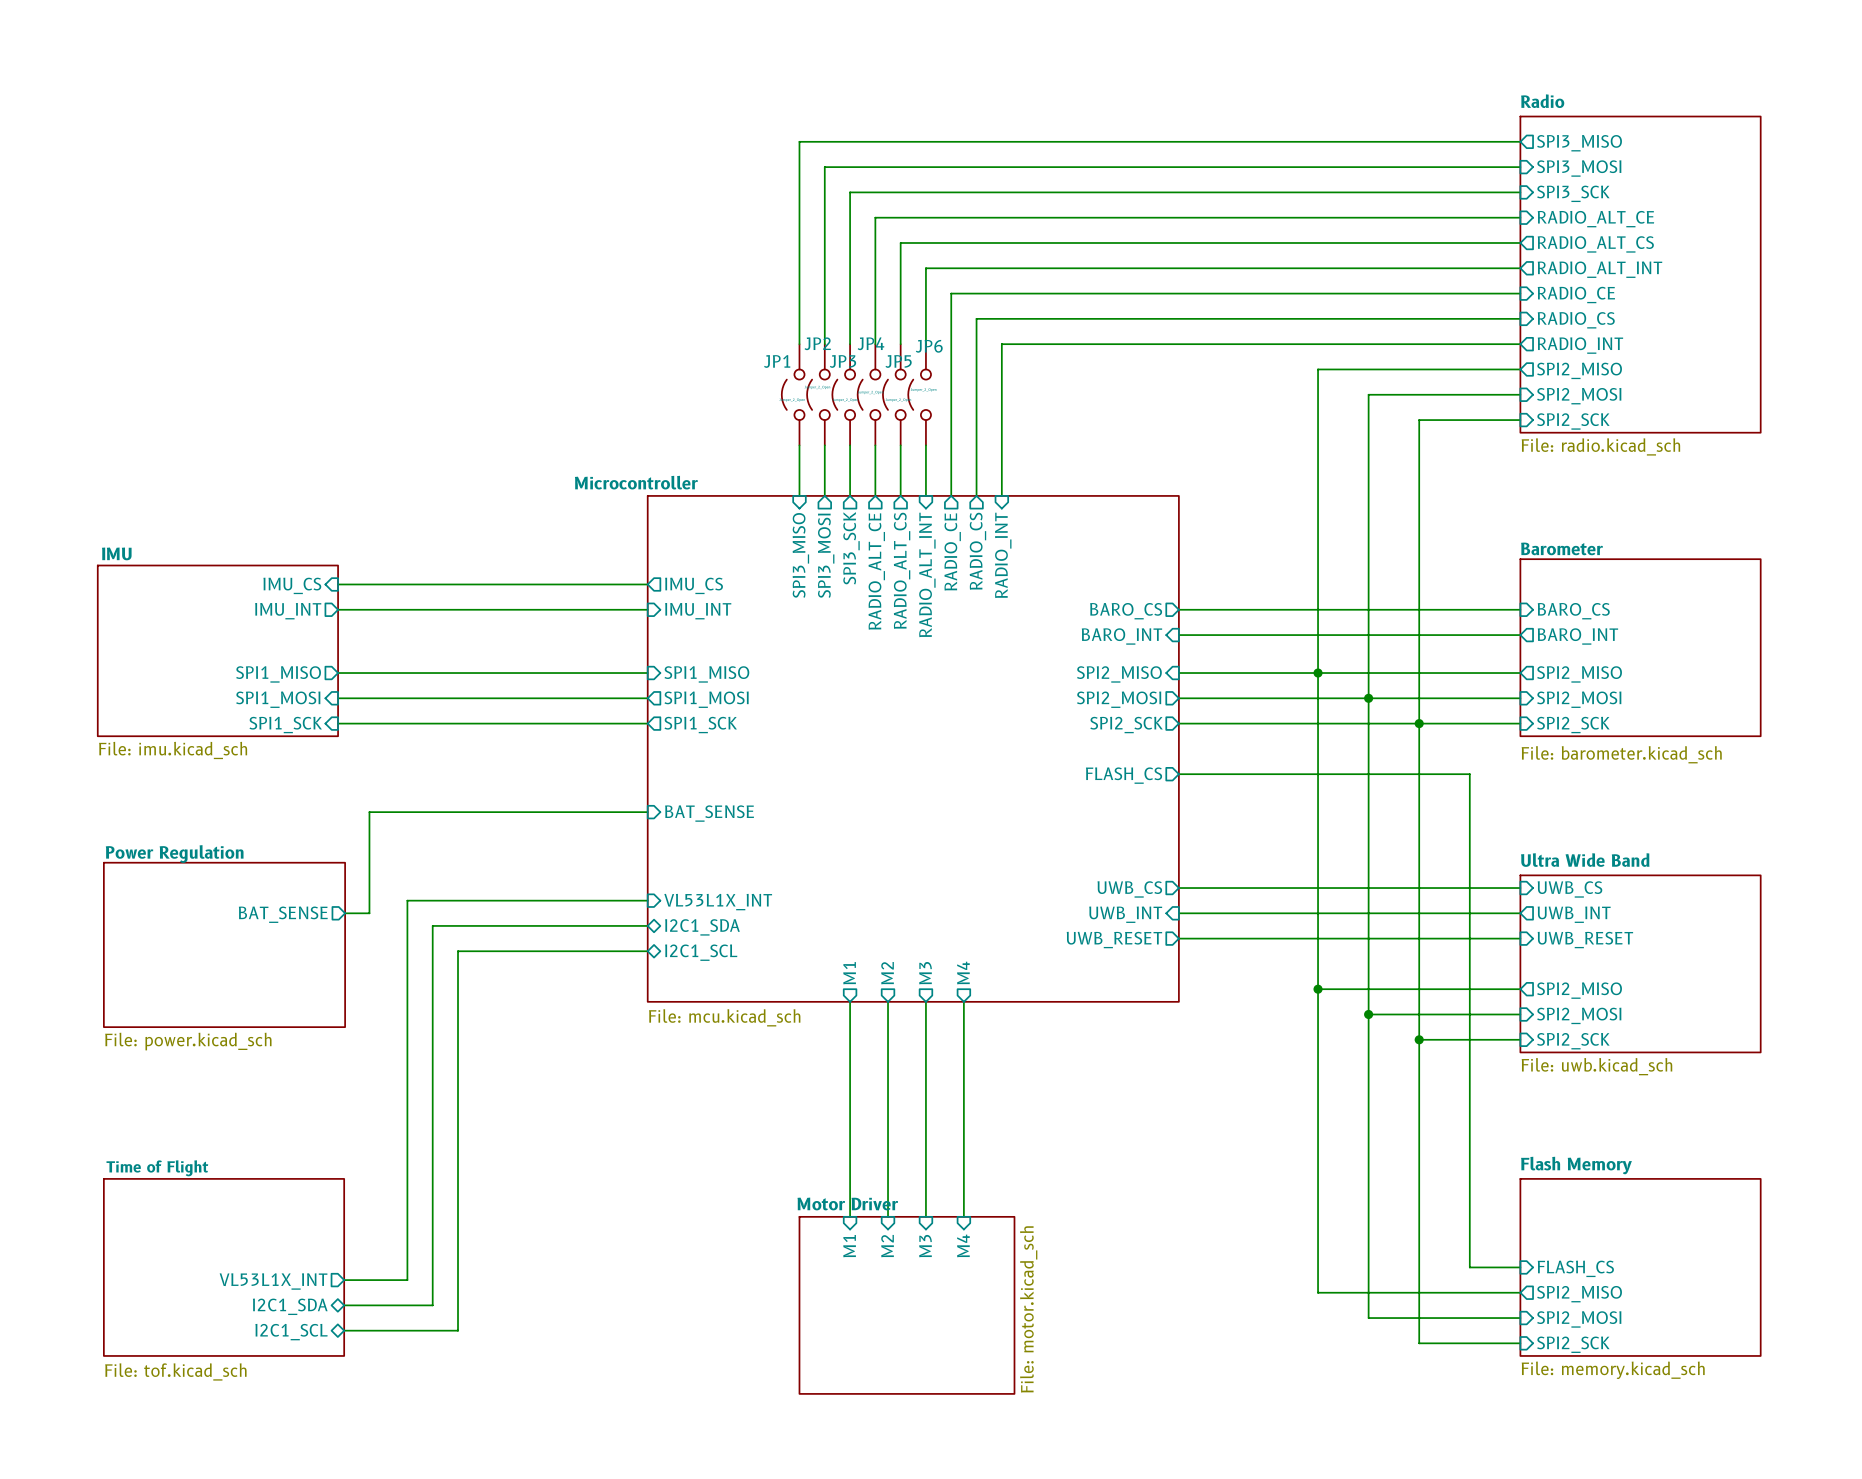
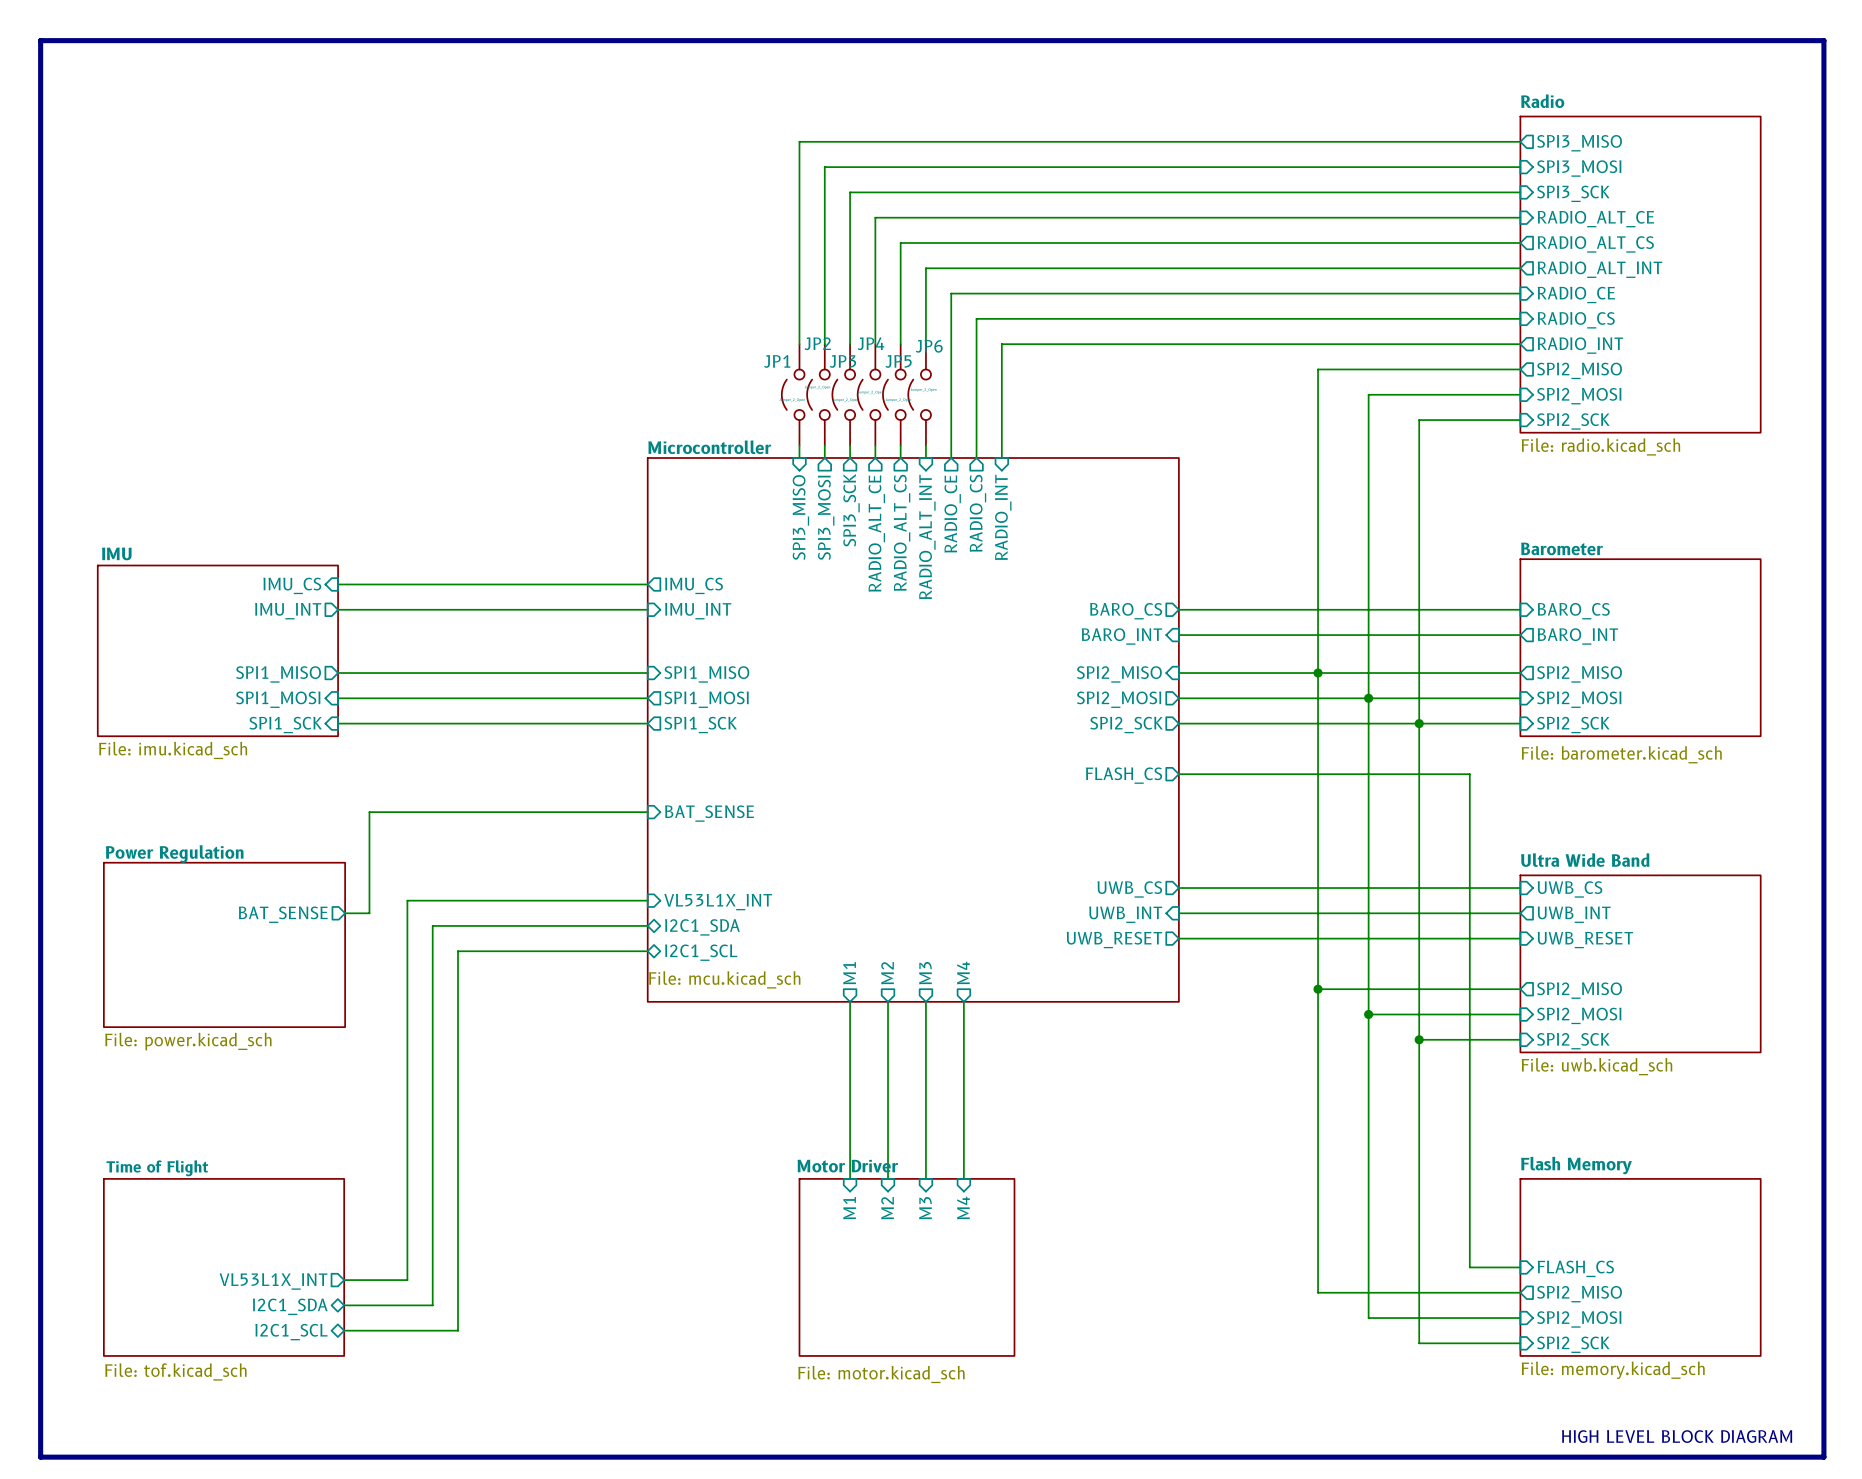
line: none -> (40, 40) (1823, 40) (1823, 1457) (40, 1457) (40, 40)
wire: (799, 458) (799, 495) -> none
wire: (824, 458) (824, 495) -> none
wire: (850, 458) (850, 495) -> none
wire: (875, 458) (875, 495) -> none
wire: (900, 458) (900, 495) -> none
wire: (925, 458) (925, 495) -> none
wire: (951, 458) (951, 495) -> none
wire: (976, 458) (976, 495) -> none
wire: (1001, 458) (1001, 495) -> none
sheet pin position: SPI3_SCK (851, 548) -> SPI3_SCK (851, 510)
sheet pin position: RADIO_CE (952, 551) -> RADIO_CE (952, 514)
sheet pin position: RADIO_CS (977, 551) -> RADIO_CS (977, 513)
sheet pin position: SPI3_MISO (800, 555) -> SPI3_MISO (800, 517)
sheet pin position: SPI3_MOSI (826, 555) -> SPI3_MOSI (826, 517)
sheet pin position: RADIO_INT (1003, 555) -> RADIO_INT (1003, 517)
sheet pin position: RADIO_ALT_CS (902, 570) -> RADIO_ALT_CS (902, 532)
sheet pin position: RADIO_ALT_CE (876, 571) -> RADIO_ALT_CE (876, 533)
sheet pin position: RADIO_ALT_INT (927, 574) -> RADIO_ALT_INT (927, 537)
sheet Microcontroller: none -> File: mcu.kicad_sch (913, 729)
sheet Microcontroller: File: mcu.kicad_sch (913, 748) -> none
wire: (850, 1178) (850, 1216) -> none
wire: (888, 1178) (888, 1216) -> none
wire: (925, 1178) (925, 1216) -> none
wire: (963, 1178) (963, 1216) -> none
sheet pin position: M4 (963, 1245) -> M4 (963, 1207)
sheet pin position: M1 (849, 1246) -> M1 (849, 1208)
sheet pin position: M2 (887, 1246) -> M2 (887, 1208)
sheet pin position: M3 (925, 1246) -> M3 (925, 1208)
sheet Motor Driver position: (906, 1305) -> (906, 1267)
sheet Motor Driver value rotation: 0° (1028, 1309) -> 90° clockwise (881, 1374)
text: none -> HIGH LEVEL BLOCK DIAGRAM (1677, 1436)

